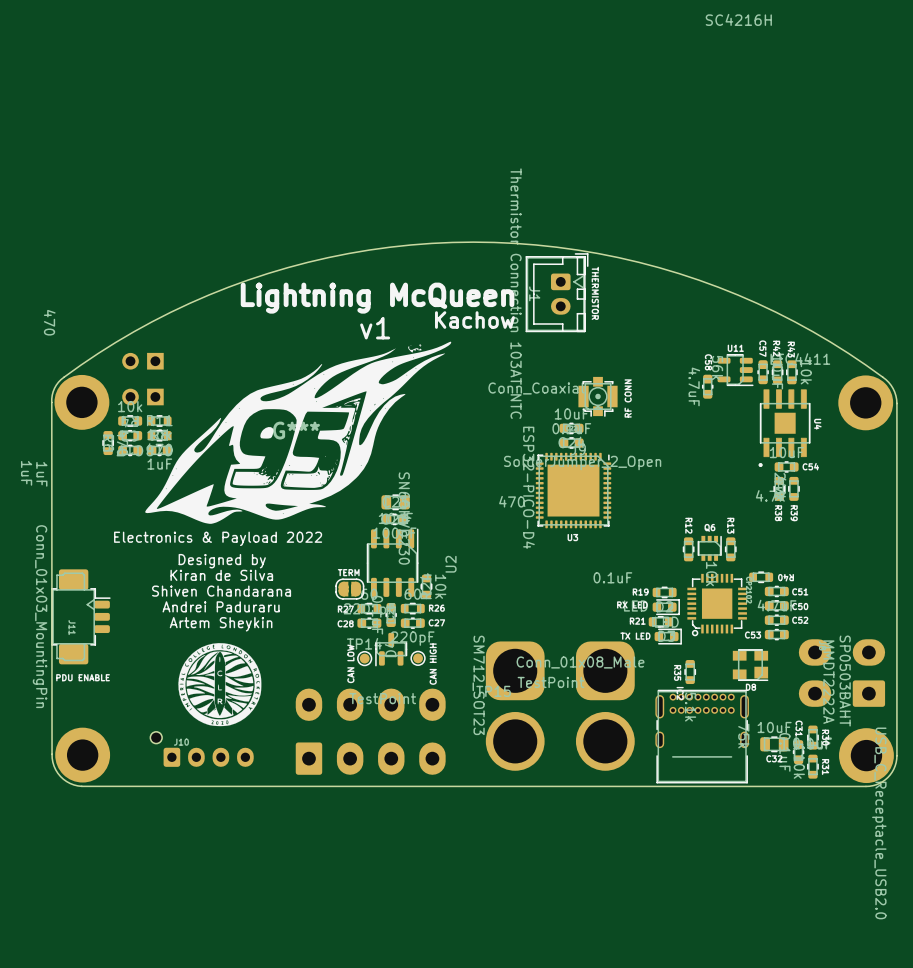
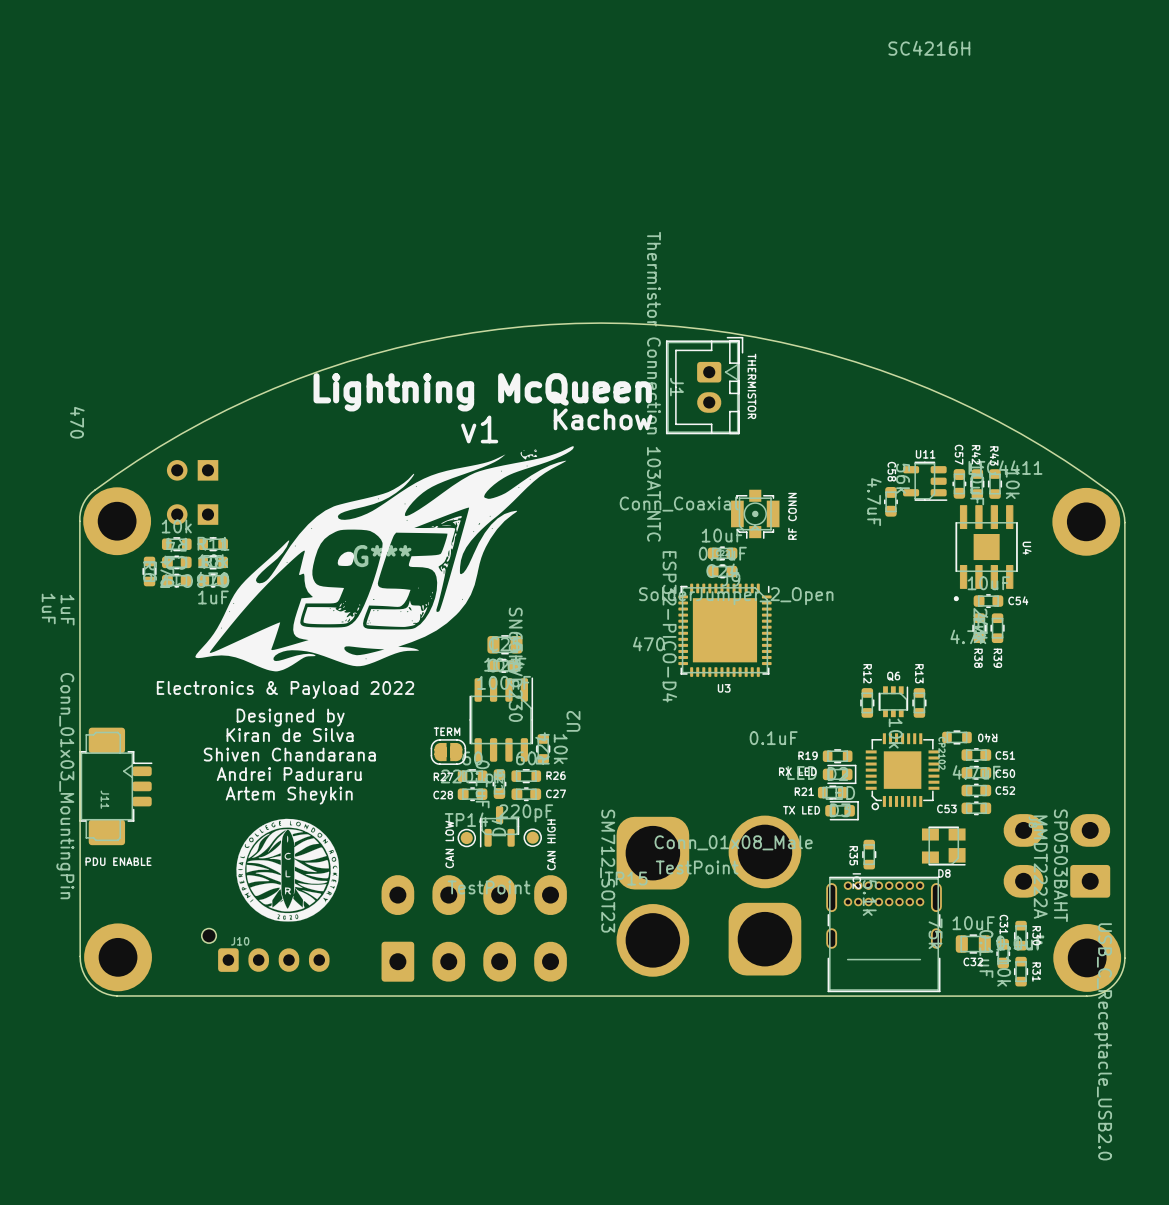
part rotation: 0° (605, 706) -> 180° (764, 895)

